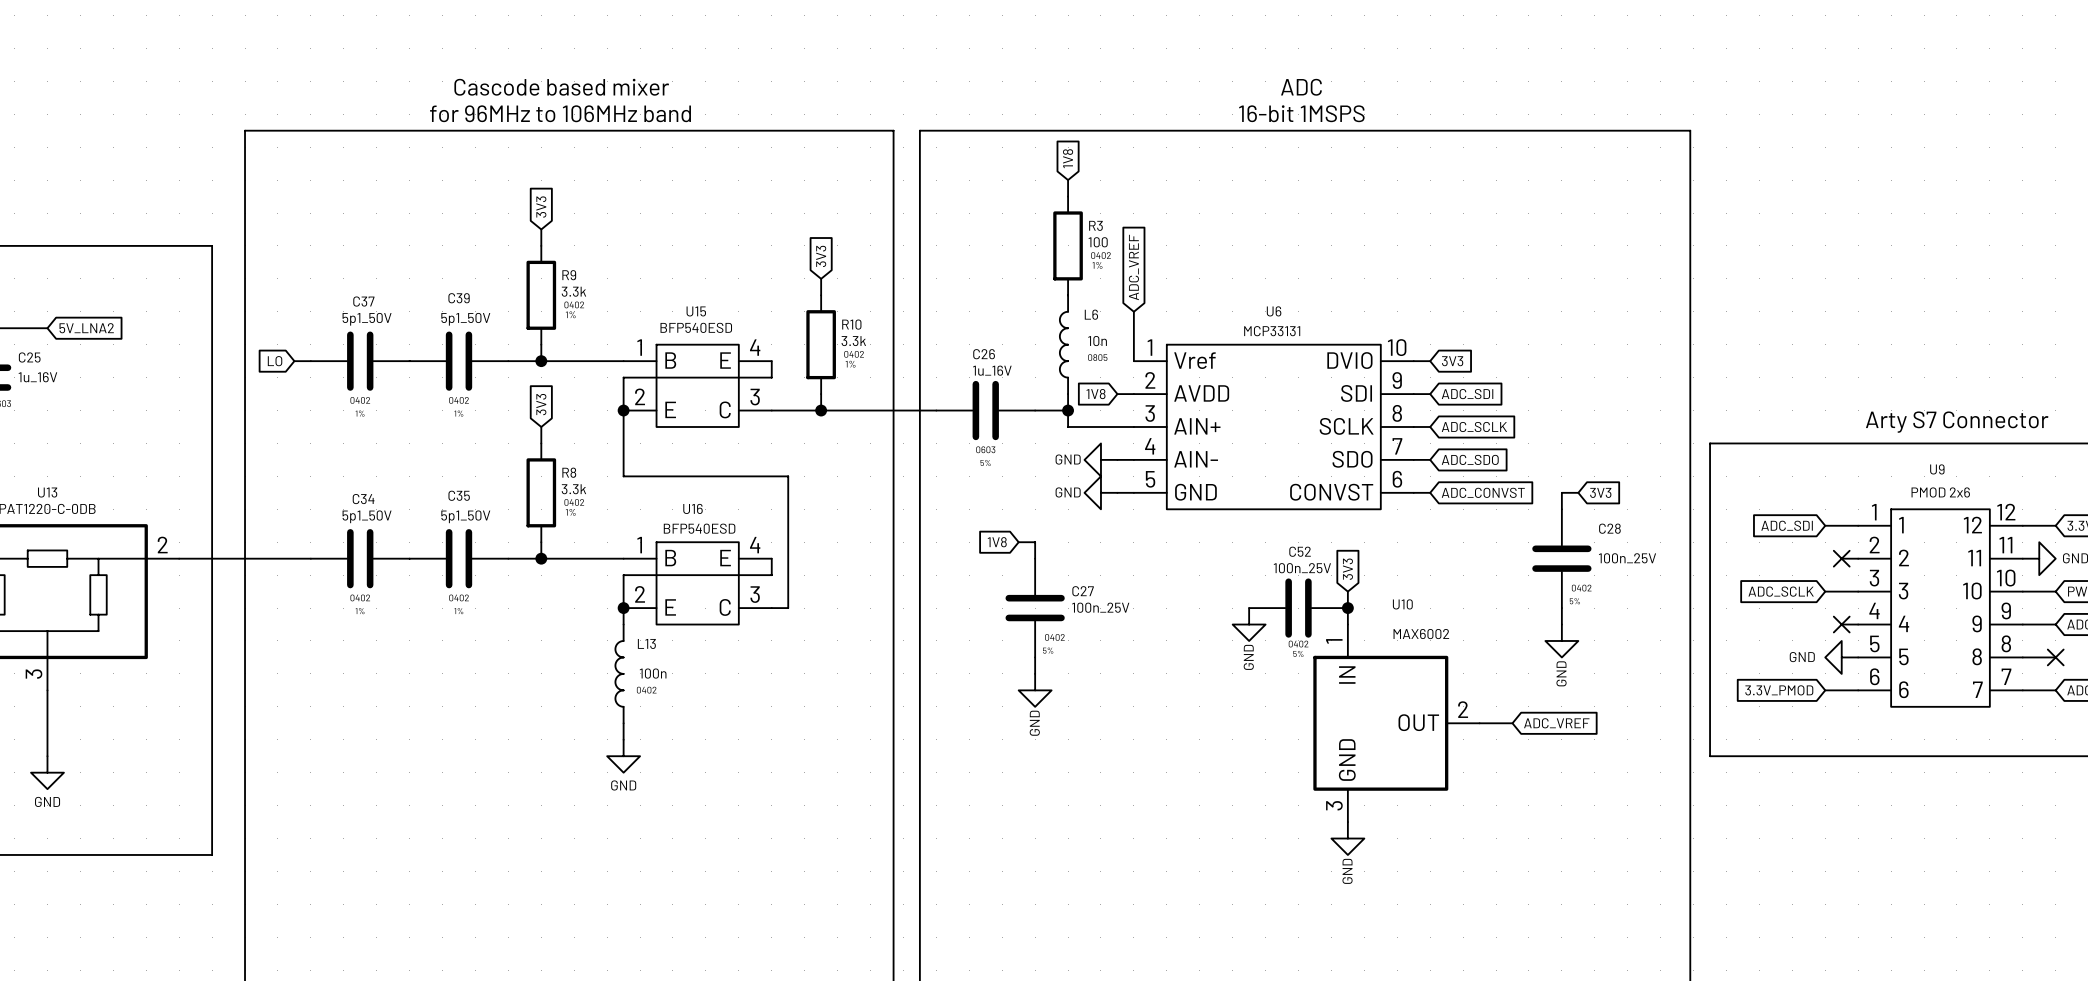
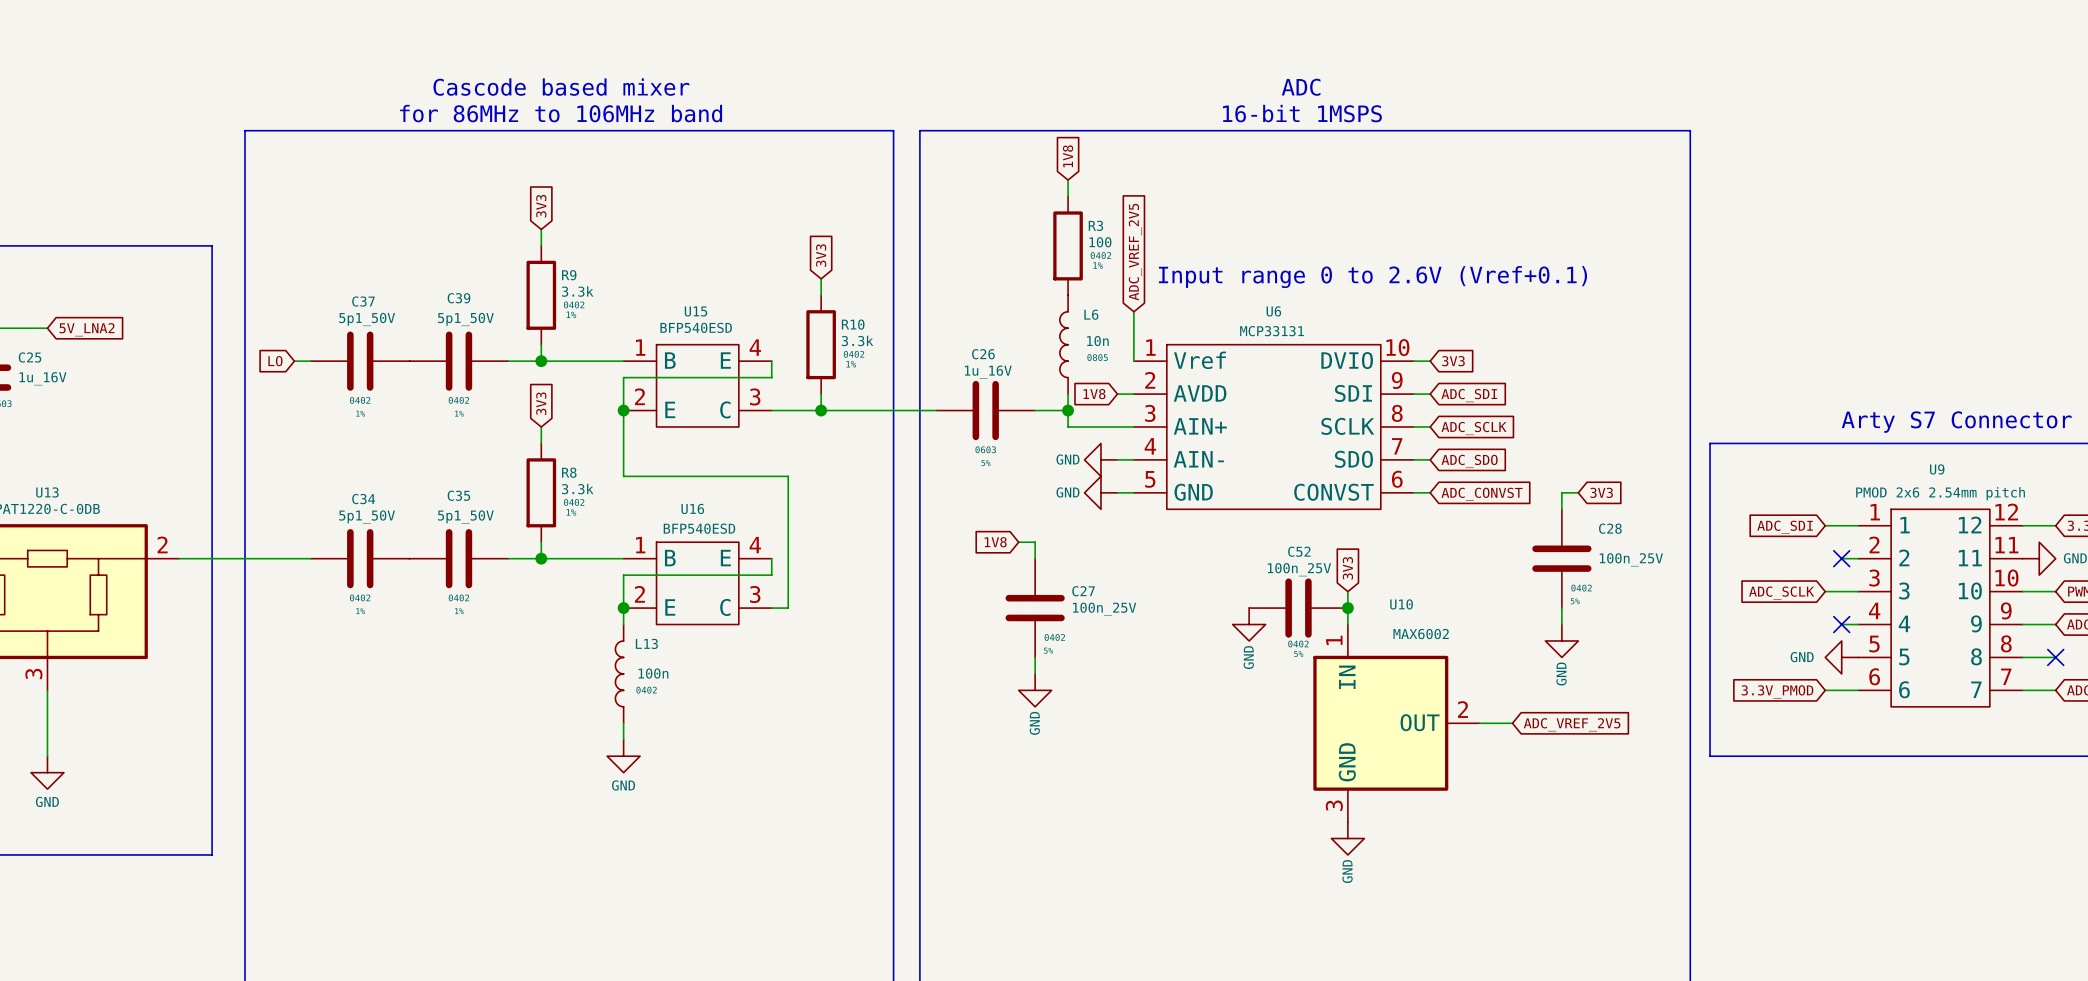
text: for 96MHz to 106MHz band (560, 113) -> for 86MHz to 106MHz band (561, 113)
global label: ADC_VREF (1133, 267) -> ADC_VREF_2V5 (1135, 252)
text: none -> Input range 0 to 2.6V (Vref+0.1) (1372, 277)
U9 value: PMOD 2x6 (1940, 492) -> PMOD 2x6 2.54mm pitch (1940, 493)
global label: ADC_VREF (1556, 723) -> ADC_VREF_2V5 (1572, 724)

